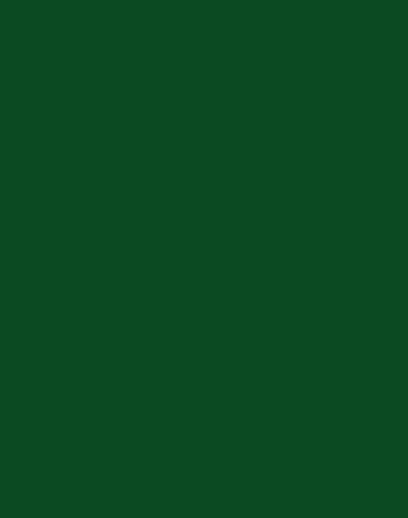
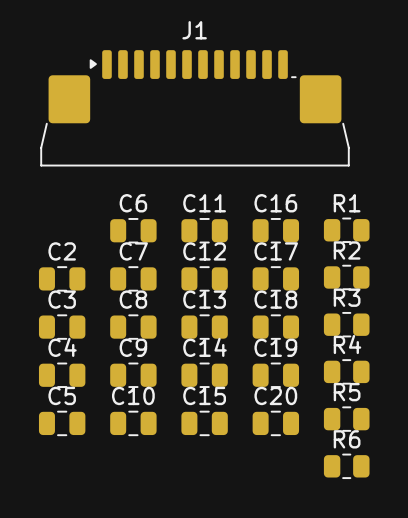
J1: none -> (195, 108)
C6: none -> (133, 230)
C11: none -> (204, 230)
C16: none -> (275, 230)
R1: none -> (346, 230)
R2: none -> (346, 277)
C2: none -> (62, 278)
C7: none -> (133, 278)
C12: none -> (204, 278)
C17: none -> (275, 278)
R3: none -> (346, 324)
C3: none -> (62, 327)
C8: none -> (133, 327)
C13: none -> (204, 327)
C18: none -> (275, 327)
R4: none -> (346, 371)
C4: none -> (62, 375)
C9: none -> (133, 375)
C14: none -> (204, 375)
C19: none -> (275, 375)
R5: none -> (346, 419)
C5: none -> (62, 423)
C10: none -> (133, 423)
C15: none -> (204, 423)
C20: none -> (275, 423)
R6: none -> (346, 466)

